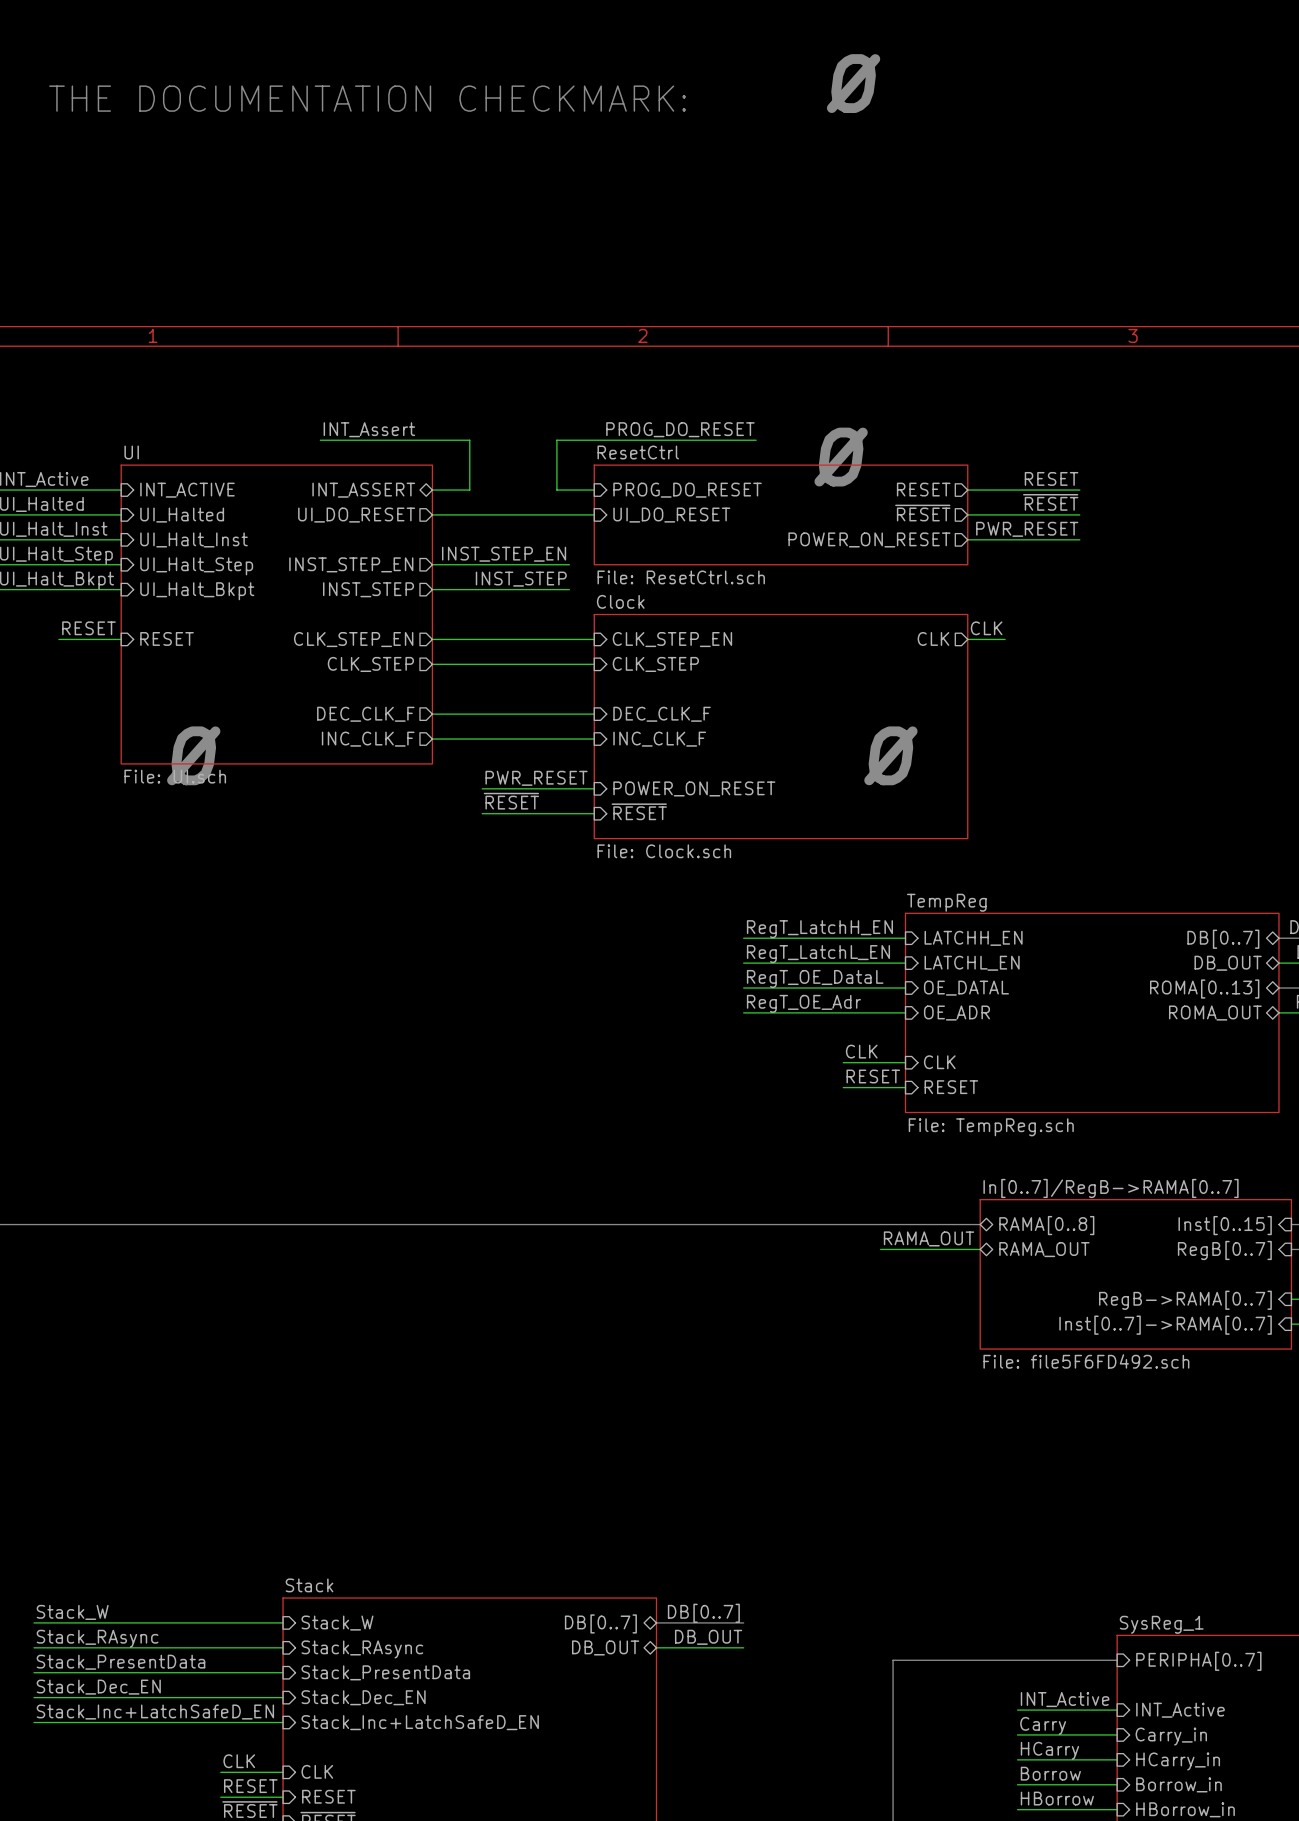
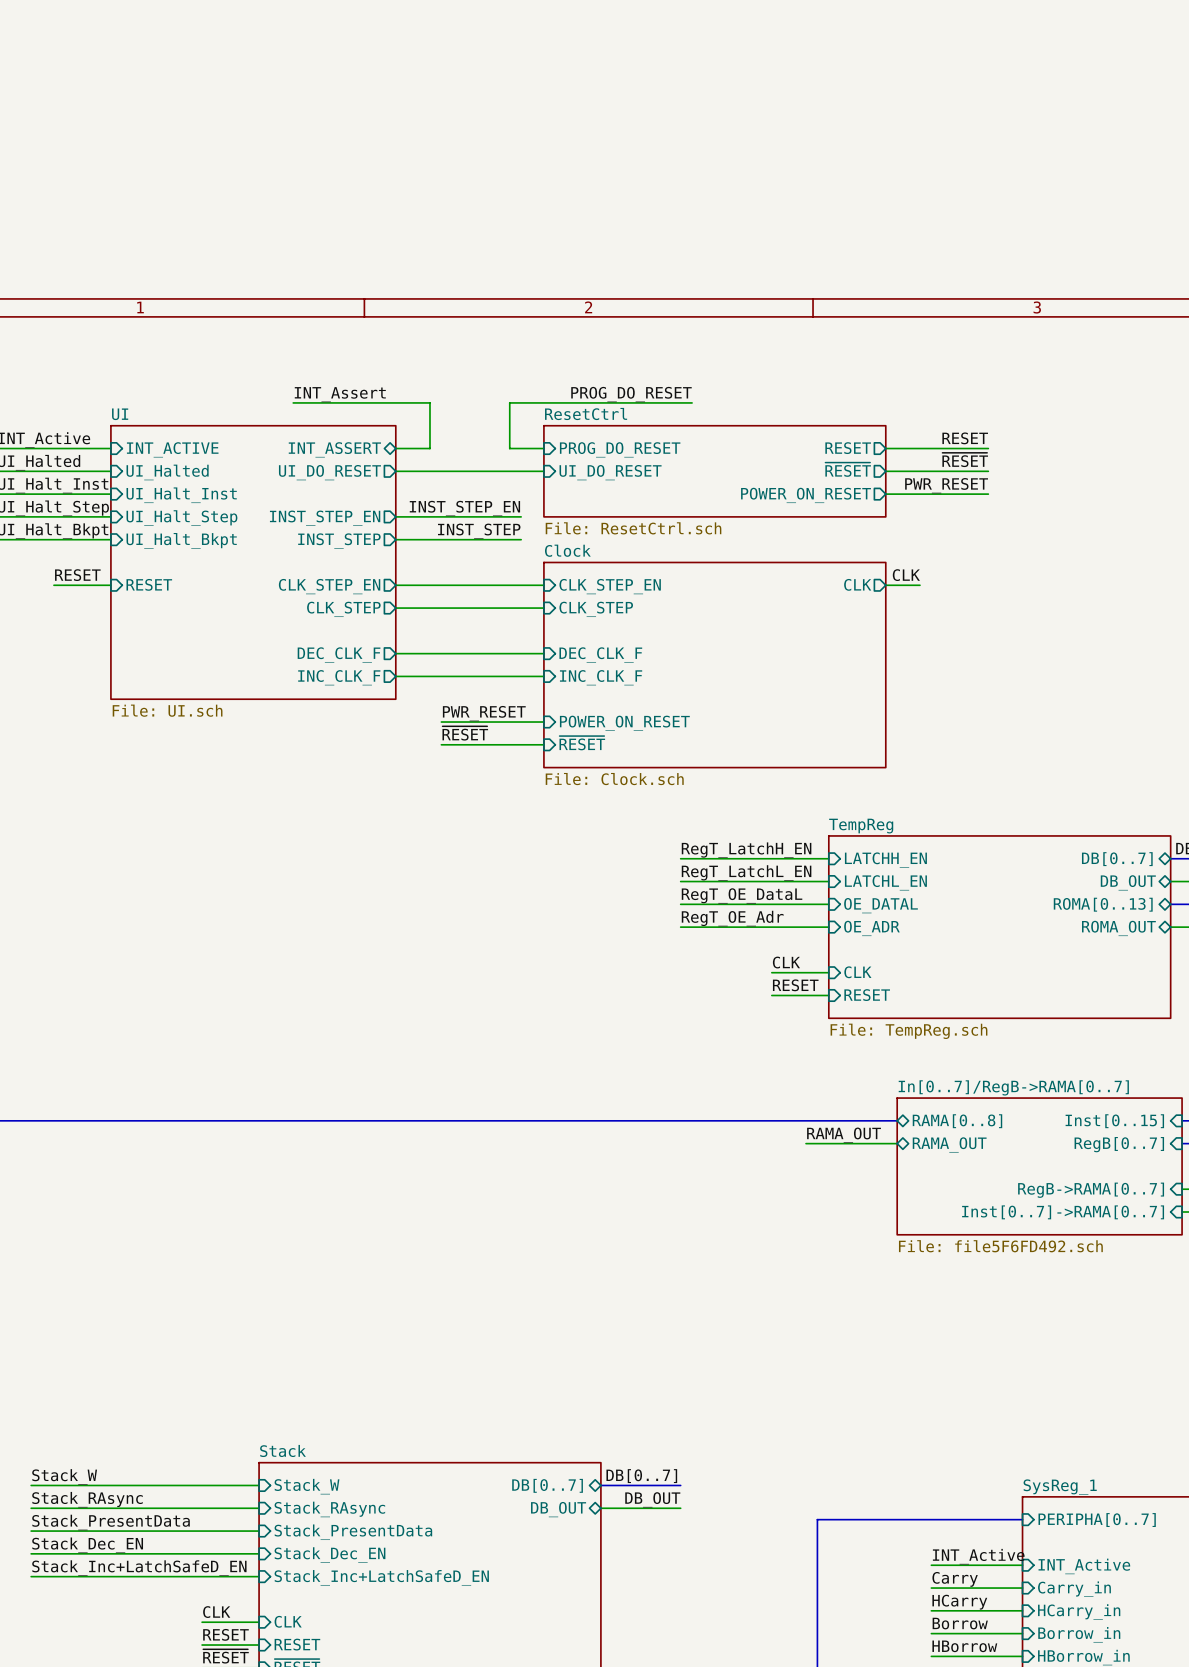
text: Ø (853, 83) -> none
text: THE DOCUMENTATION CHECKMARK: (367, 98) -> none
text: Ø (841, 457) -> none
text: Ø (193, 755) -> none
text: Ø (890, 755) -> none

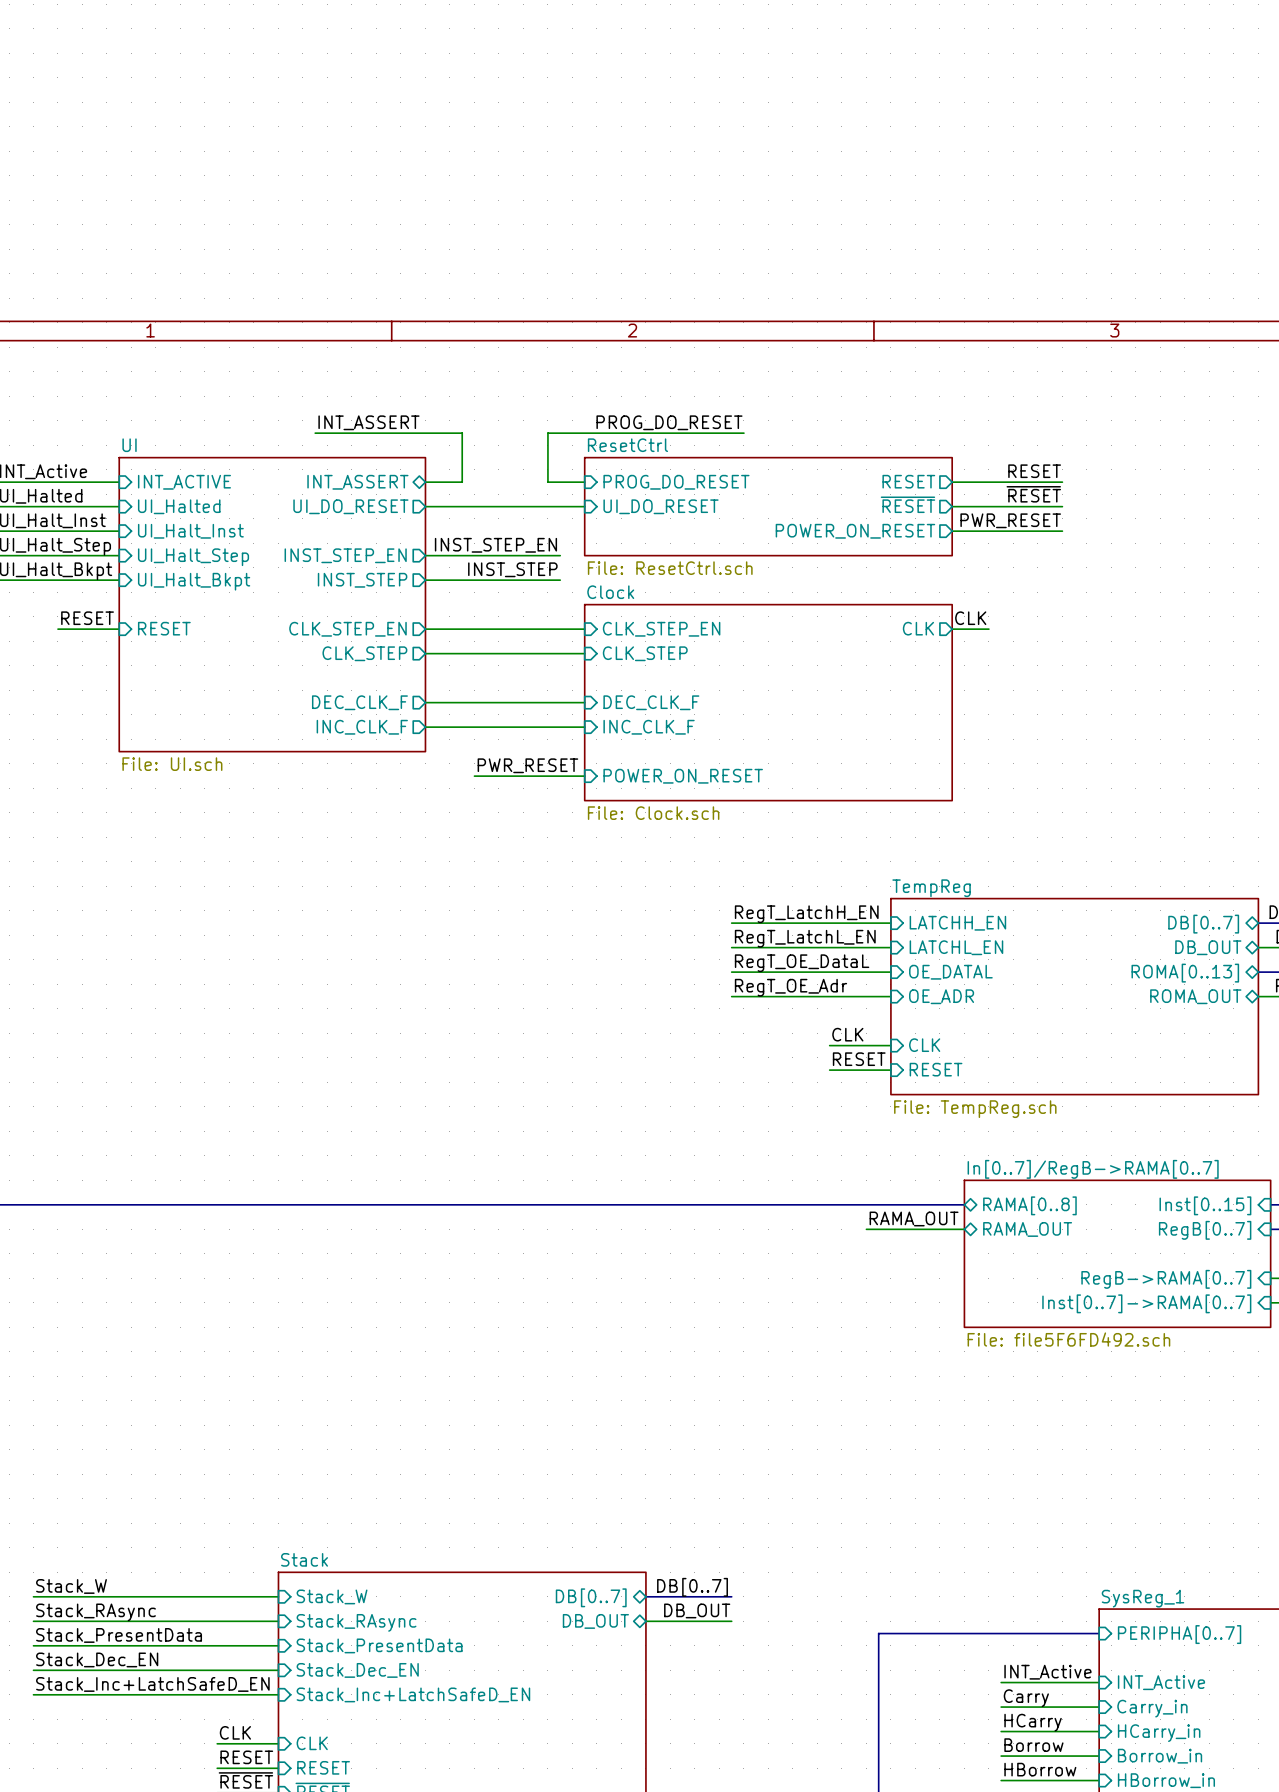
label: INT_Assert (340, 394) -> INT_ASSERT (368, 422)
sheet Clock: none -> File: Clock.sch (768, 702)
sheet Clock: File: Clock.sch (714, 665) -> none
label: ~{RESET} (465, 733) -> none
sheet pin: ~{RESET} (582, 743) -> none
wire: (441, 744) (543, 744) -> none

